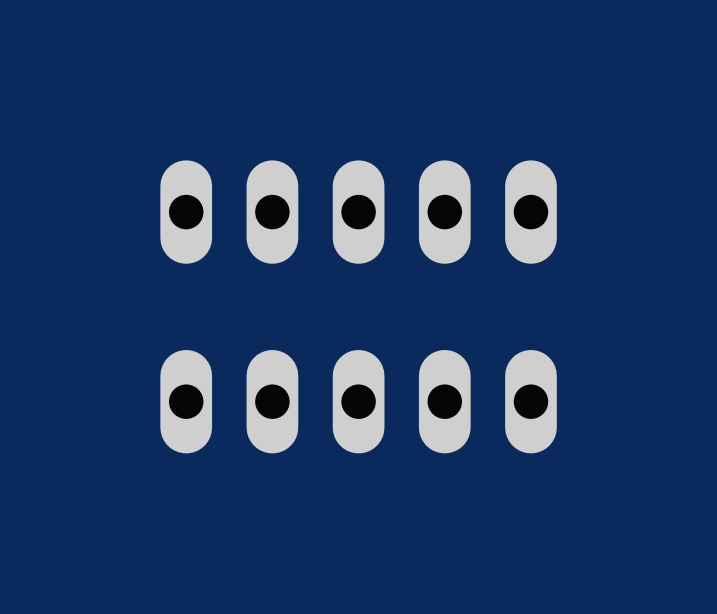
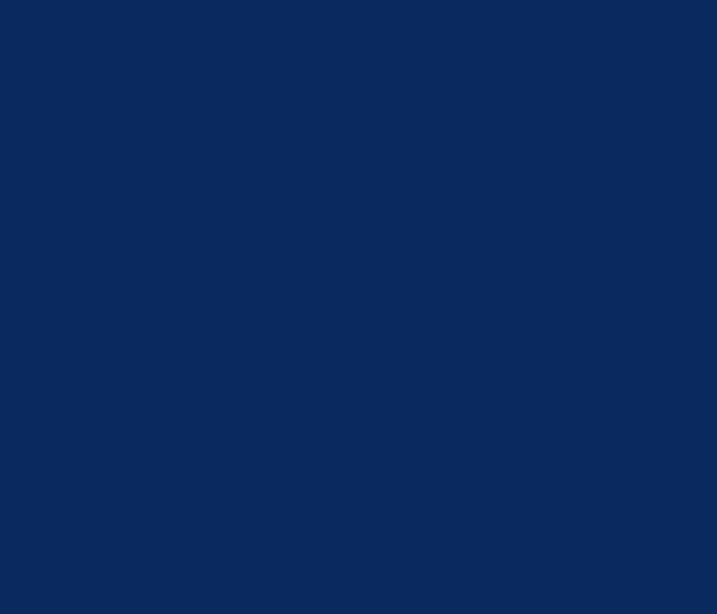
part: (358, 212) -> none
part: (358, 401) -> none

